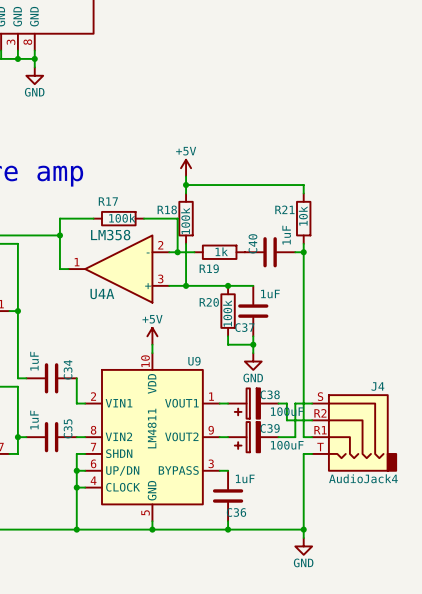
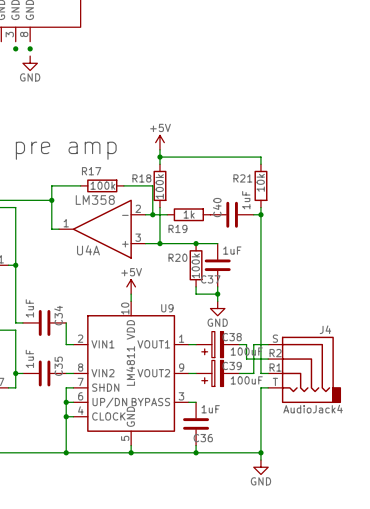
wire: (1, 50) (1, 58) (34, 58) -> none
wire: (17, 50) (17, 58) -> none
wire: (34, 50) (34, 67) -> none

